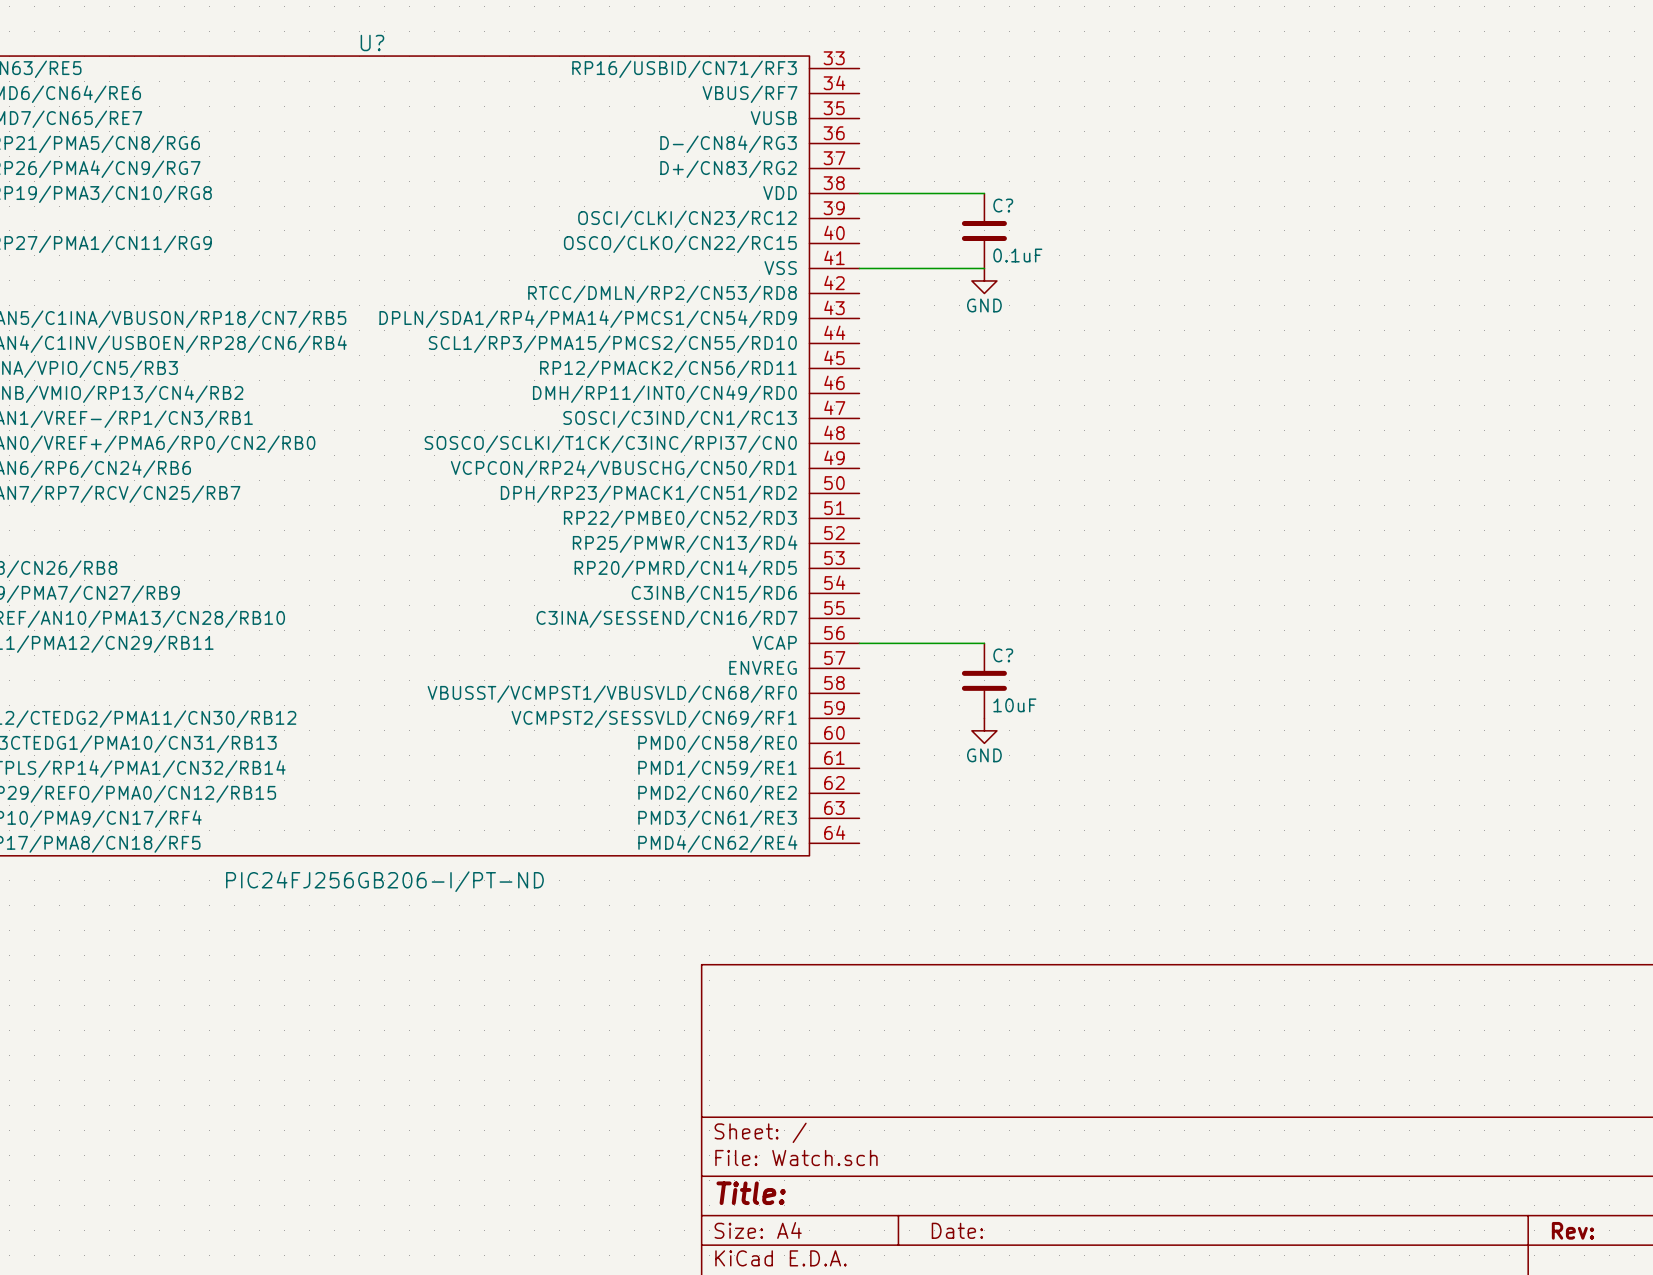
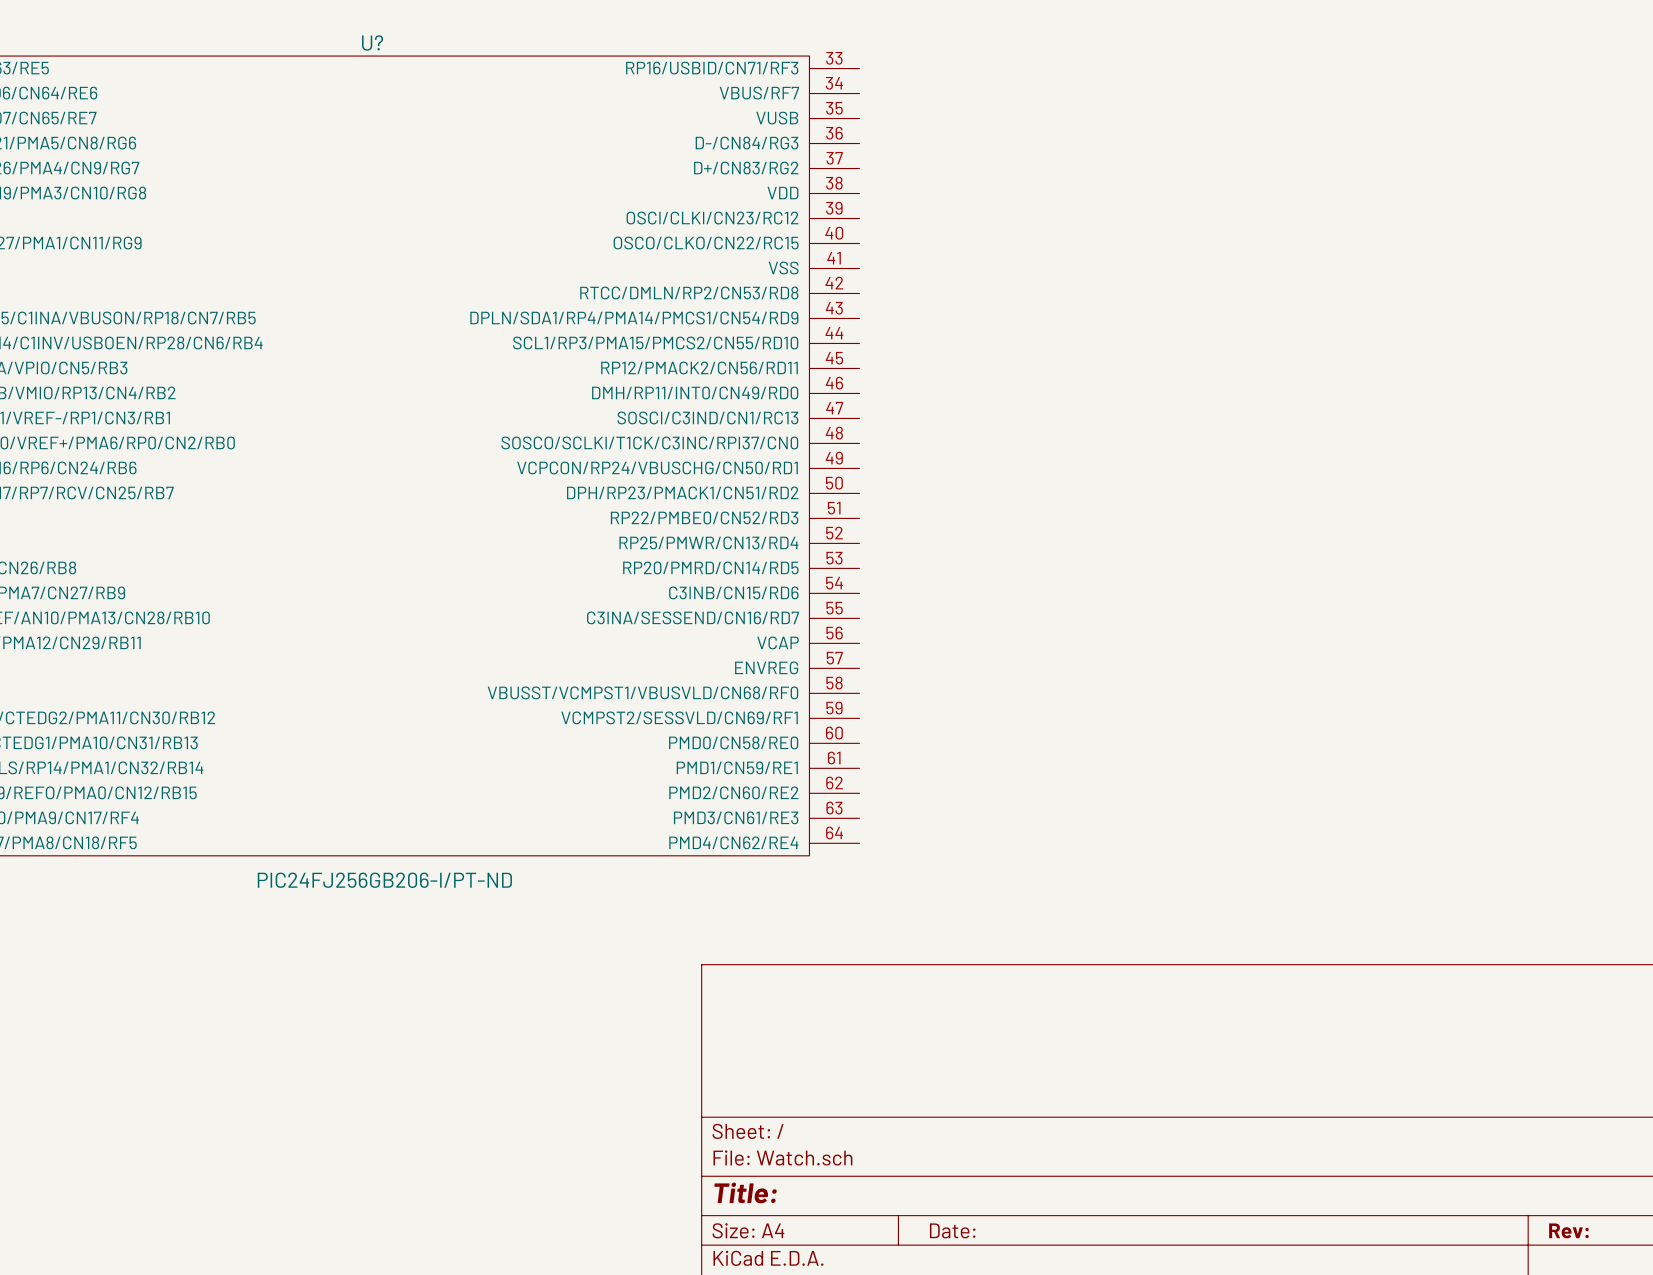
wire: (859, 193) (984, 193) -> none
C?: 0.1uF (984, 230) -> none
wire: (859, 268) (984, 268) -> none
power symbol: GND (984, 280) -> none
wire: (859, 643) (984, 643) -> none
C?: 10uF (984, 680) -> none
power symbol: GND (984, 730) -> none

